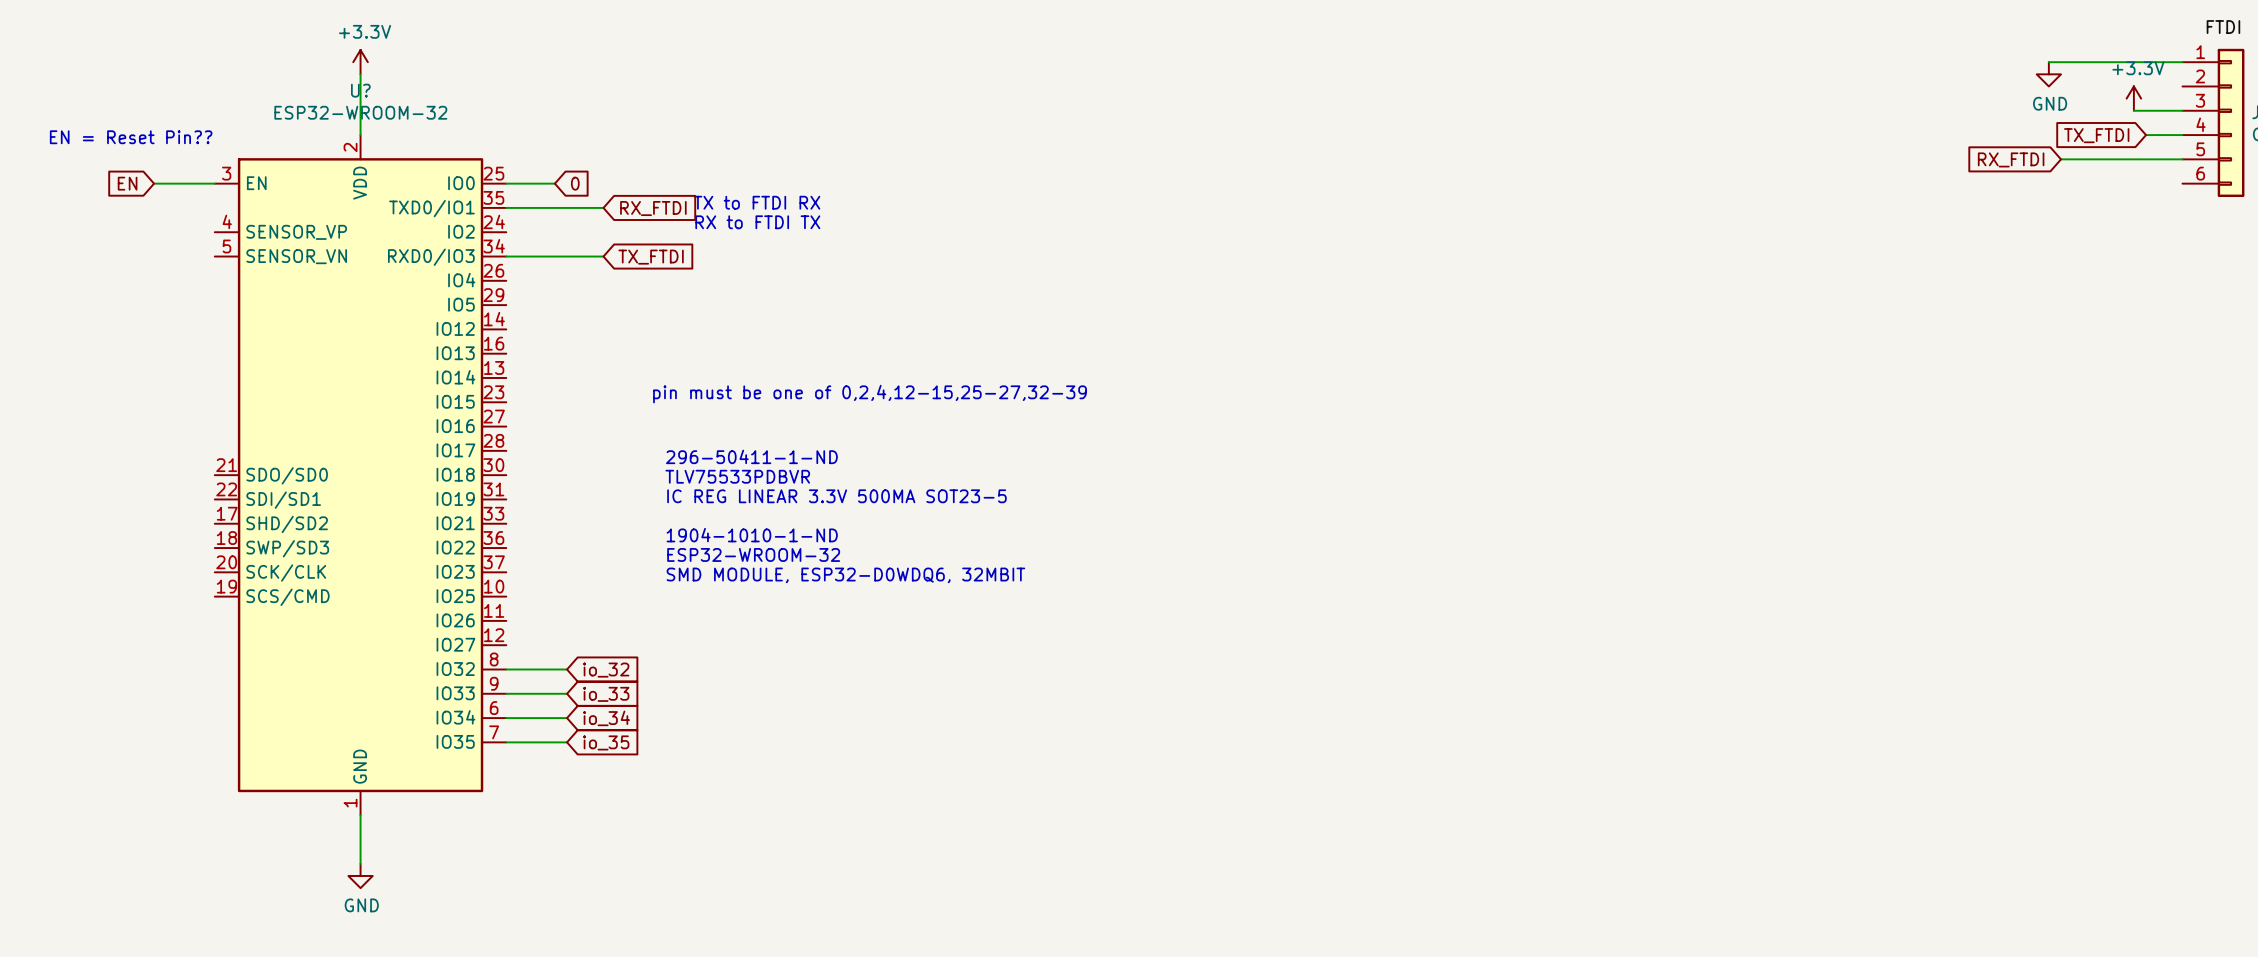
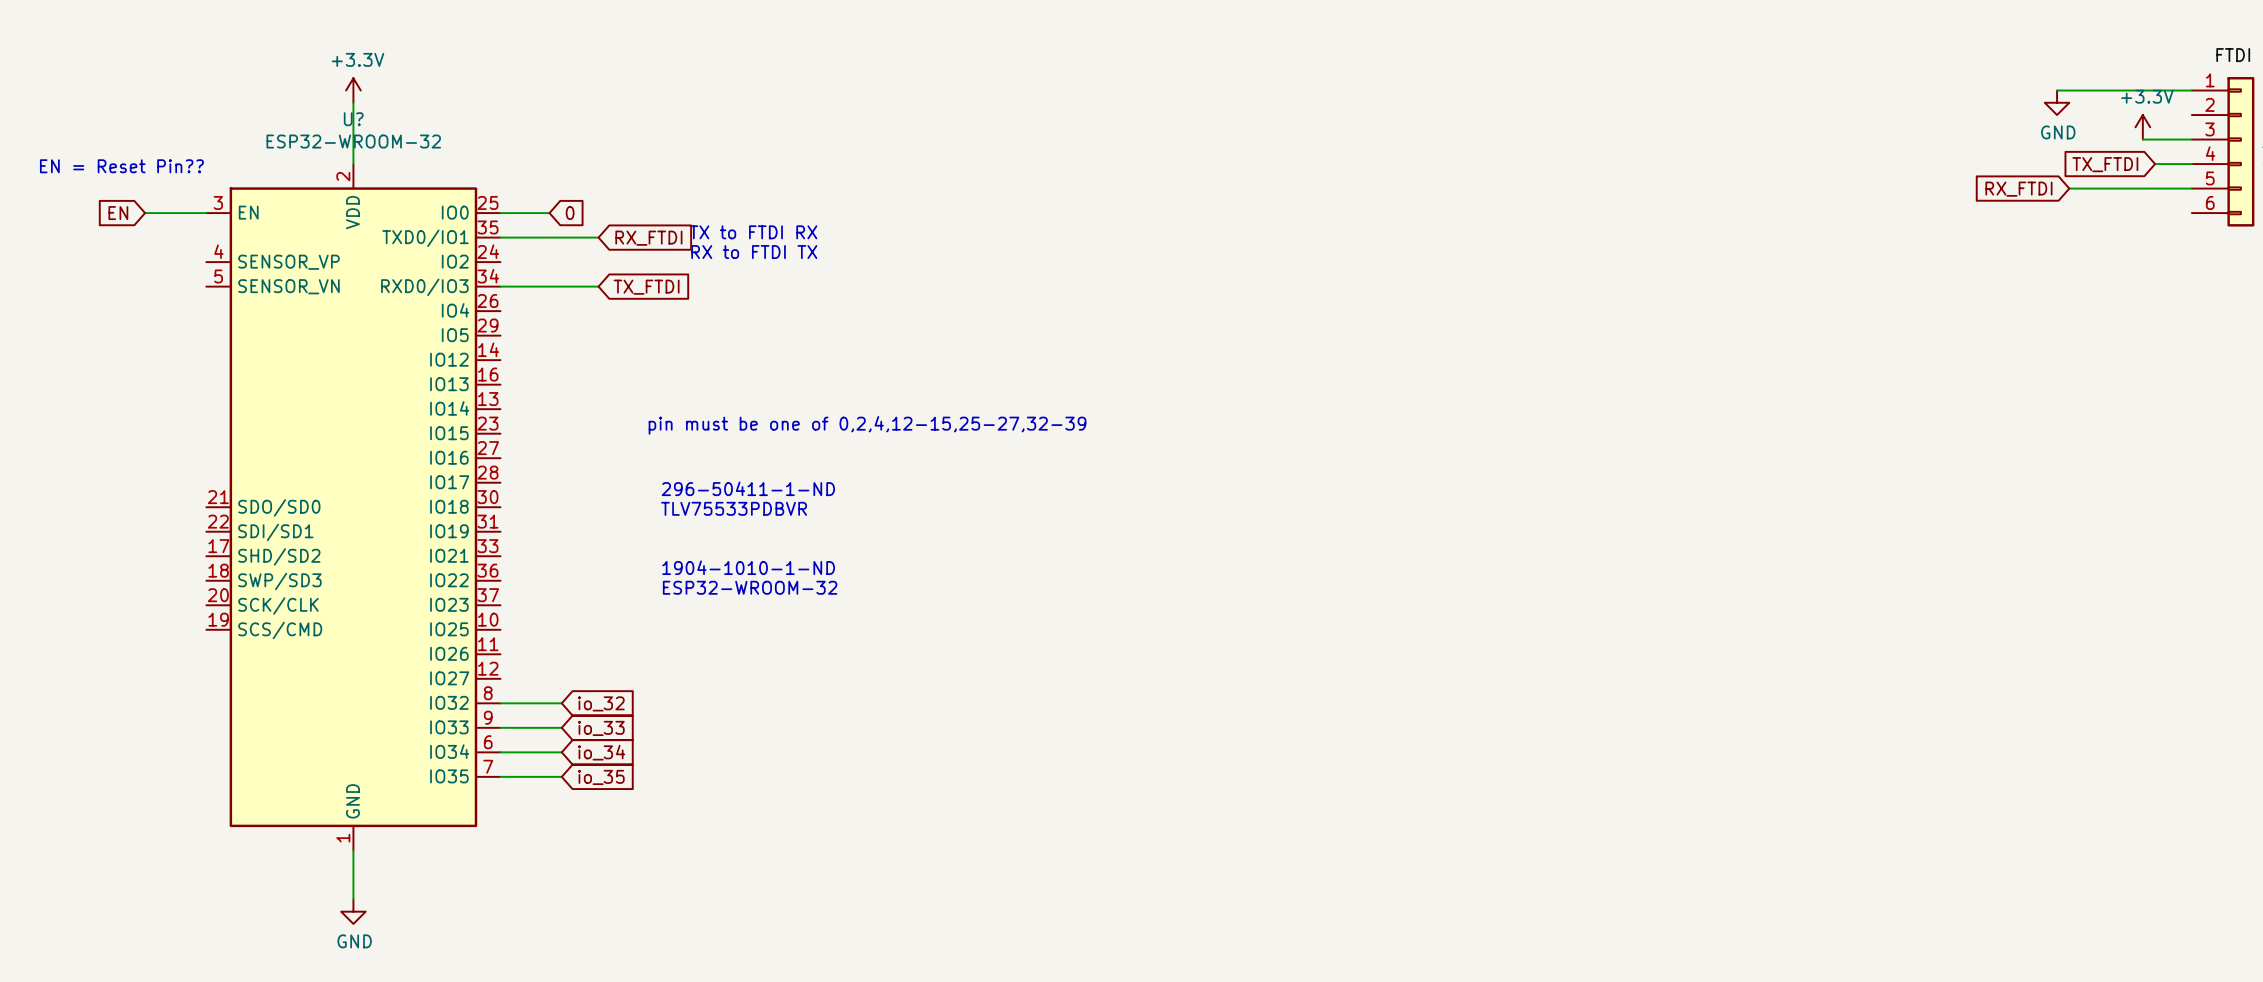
text: IC REG LINEAR 3.3V 500MA SOT23-5 (836, 496) -> none
text: SMD MODULE, ESP32-D0WDQ6, 32MBIT (845, 575) -> none

